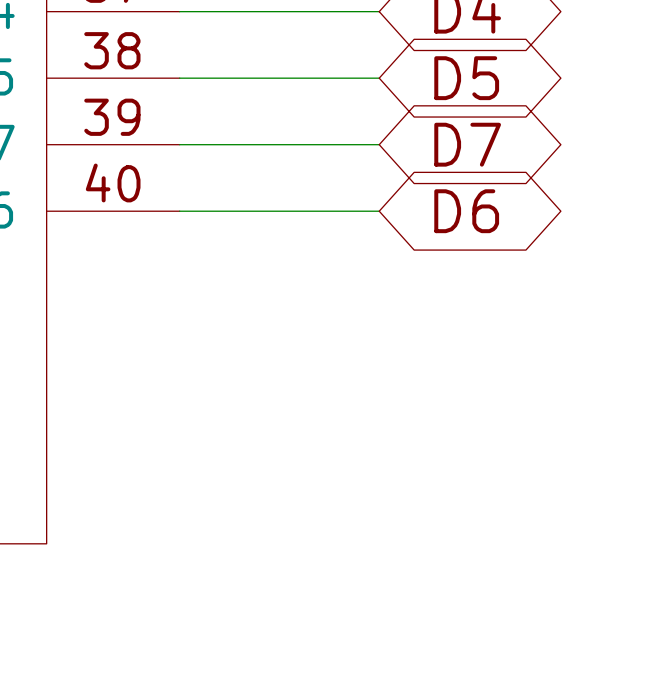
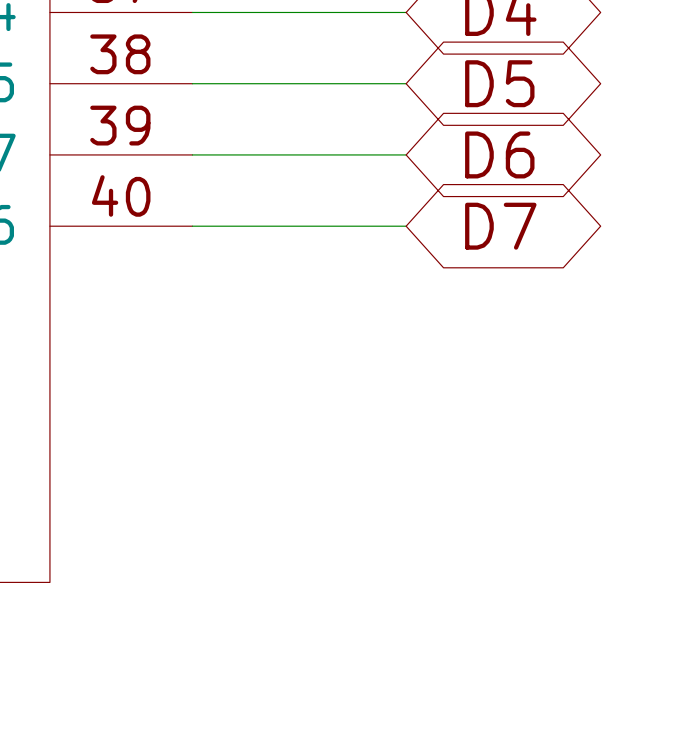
global label: D7 (467, 144) -> D6 (499, 154)
global label: D6 (466, 211) -> D7 (500, 226)

